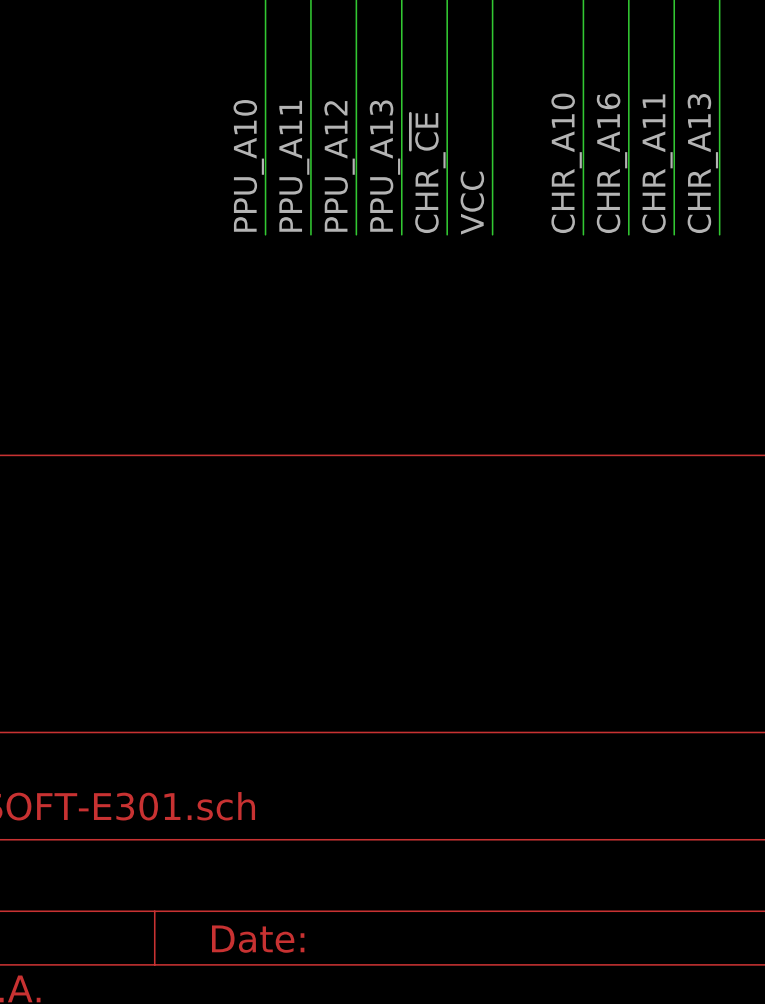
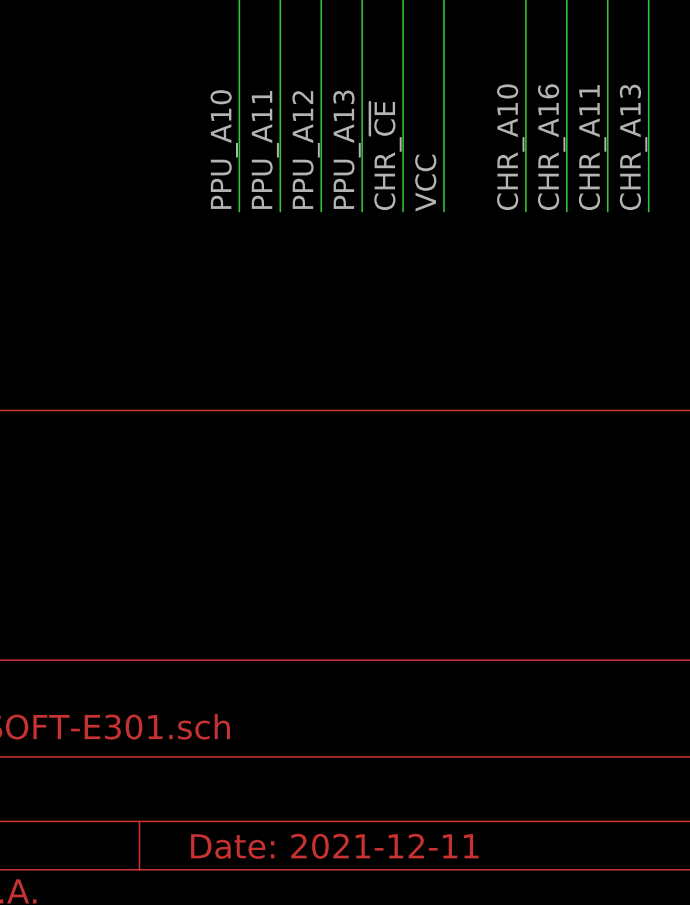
title block: Date: (258, 939) -> Date: 2021-12-11 (334, 846)

